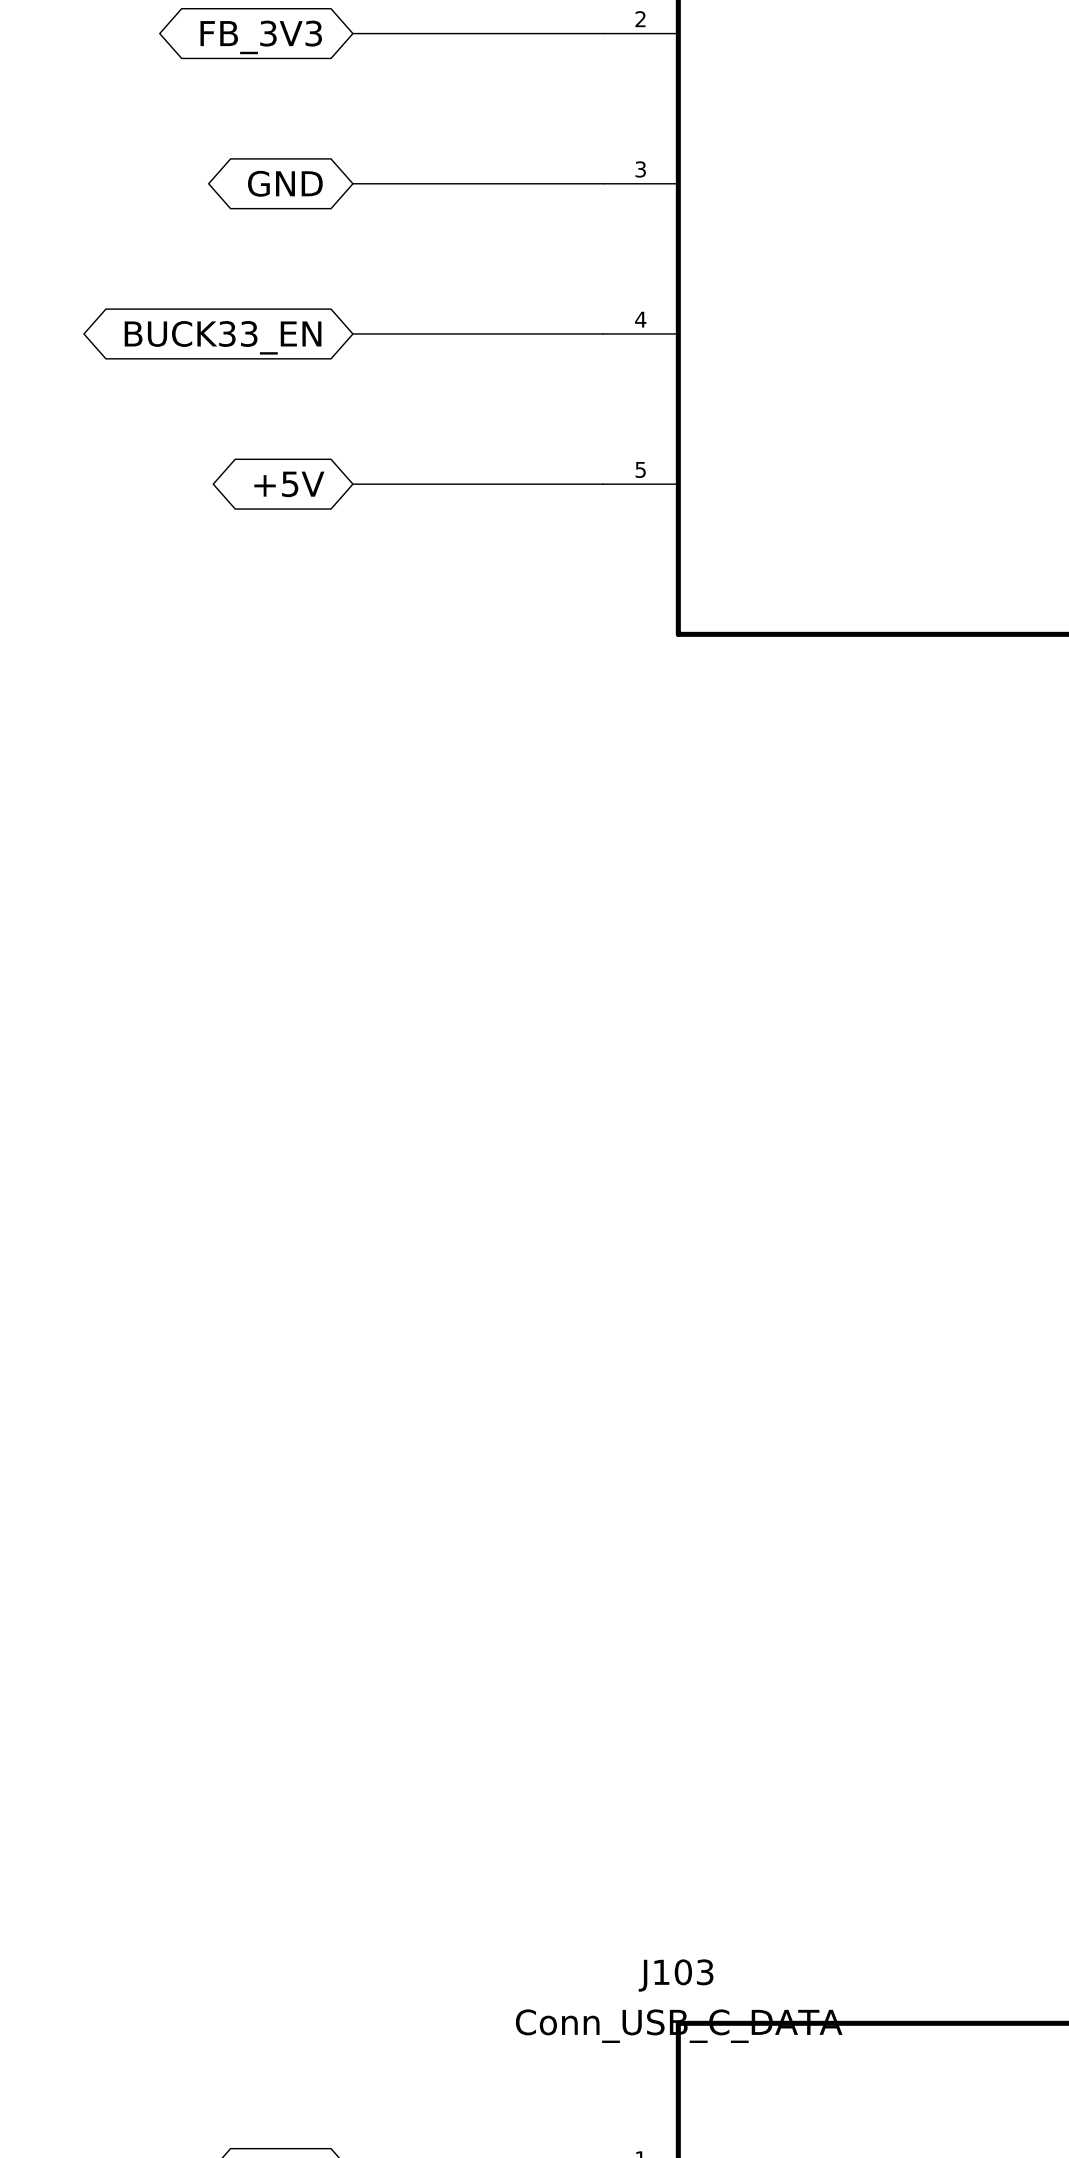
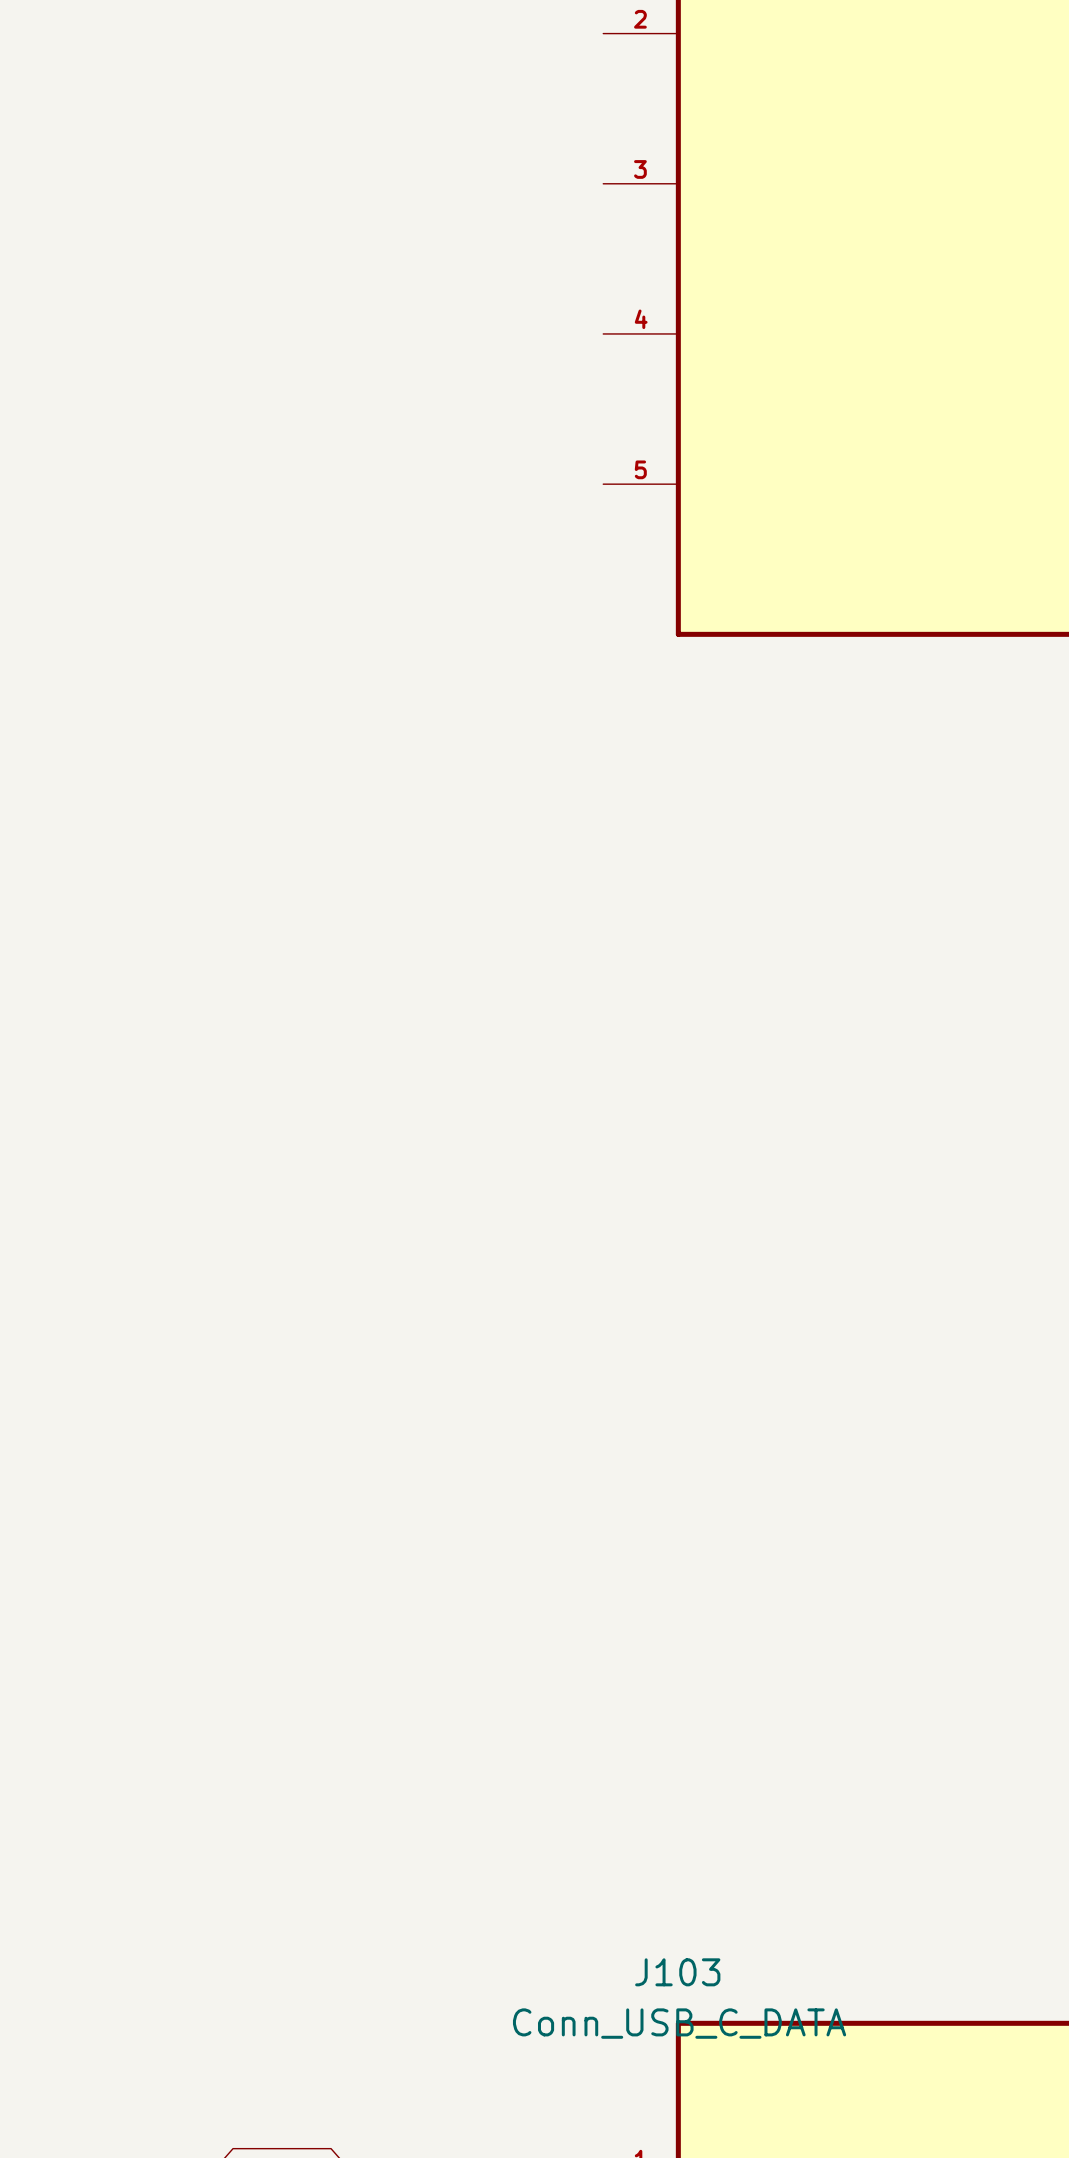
wire: (352, 33) (603, 33) -> none
global label: FB_3V3 (261, 37) -> none
global label: GND (285, 183) -> none
wire: (352, 183) (603, 183) -> none
wire: (352, 333) (603, 333) -> none
global label: BUCK33_EN (223, 337) -> none
global label: +5V (289, 484) -> none
wire: (352, 484) (603, 484) -> none

